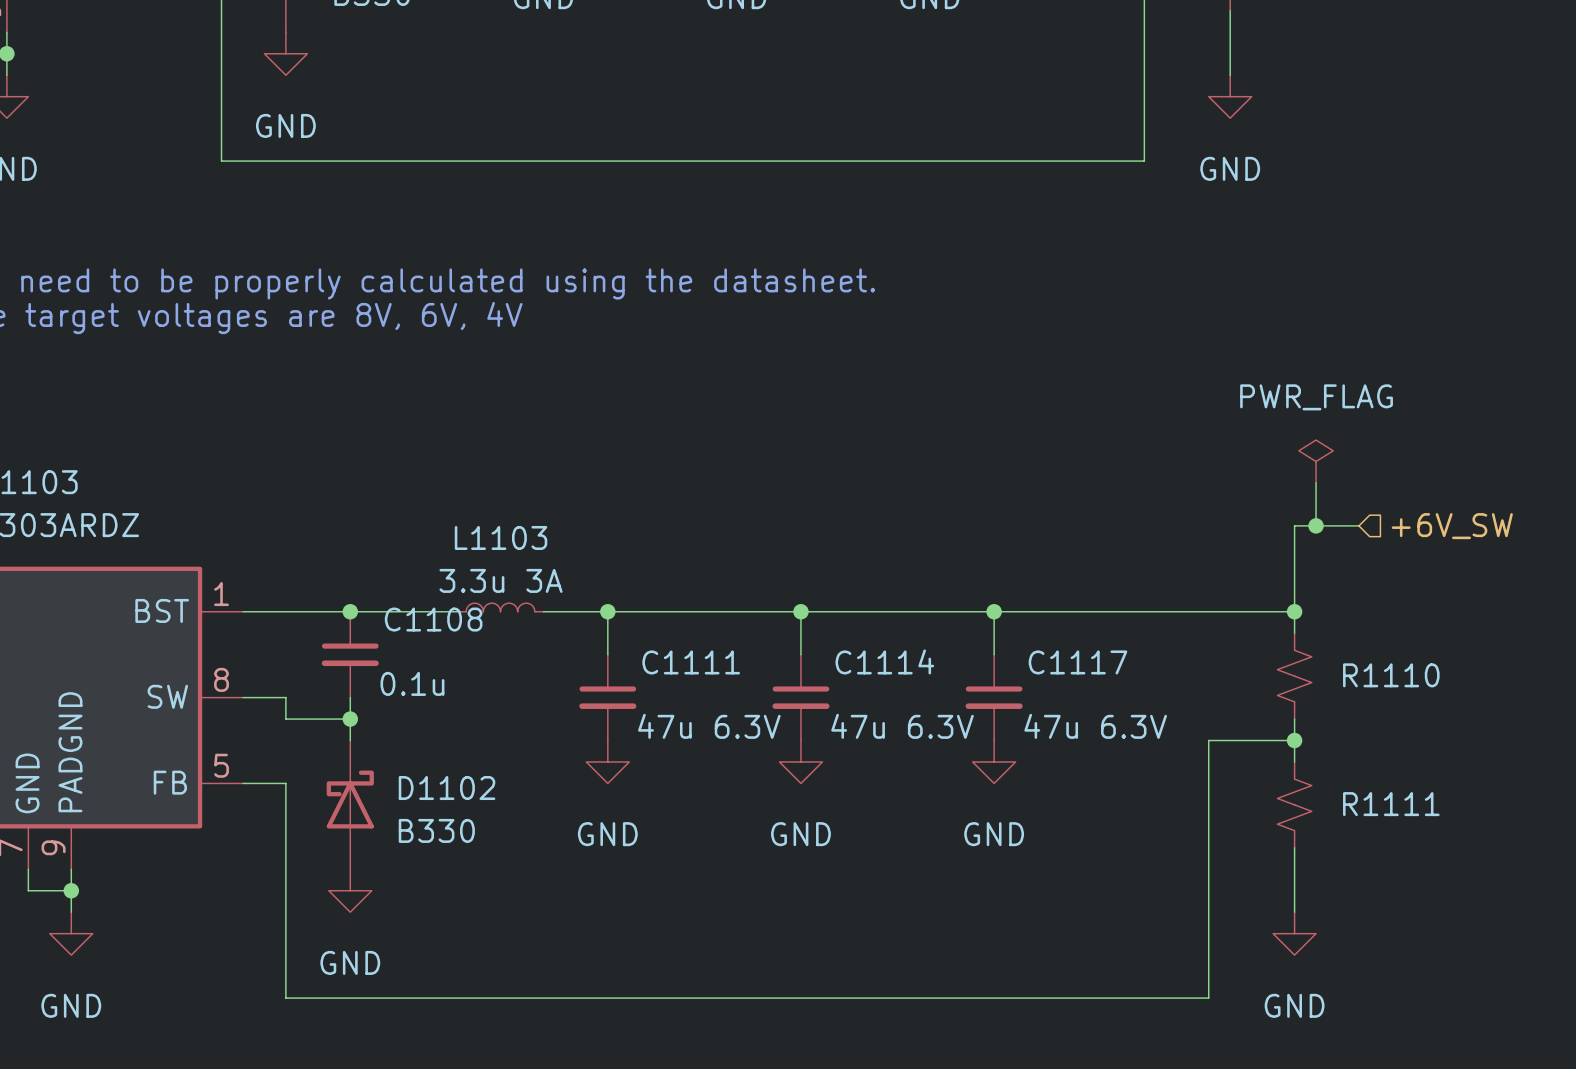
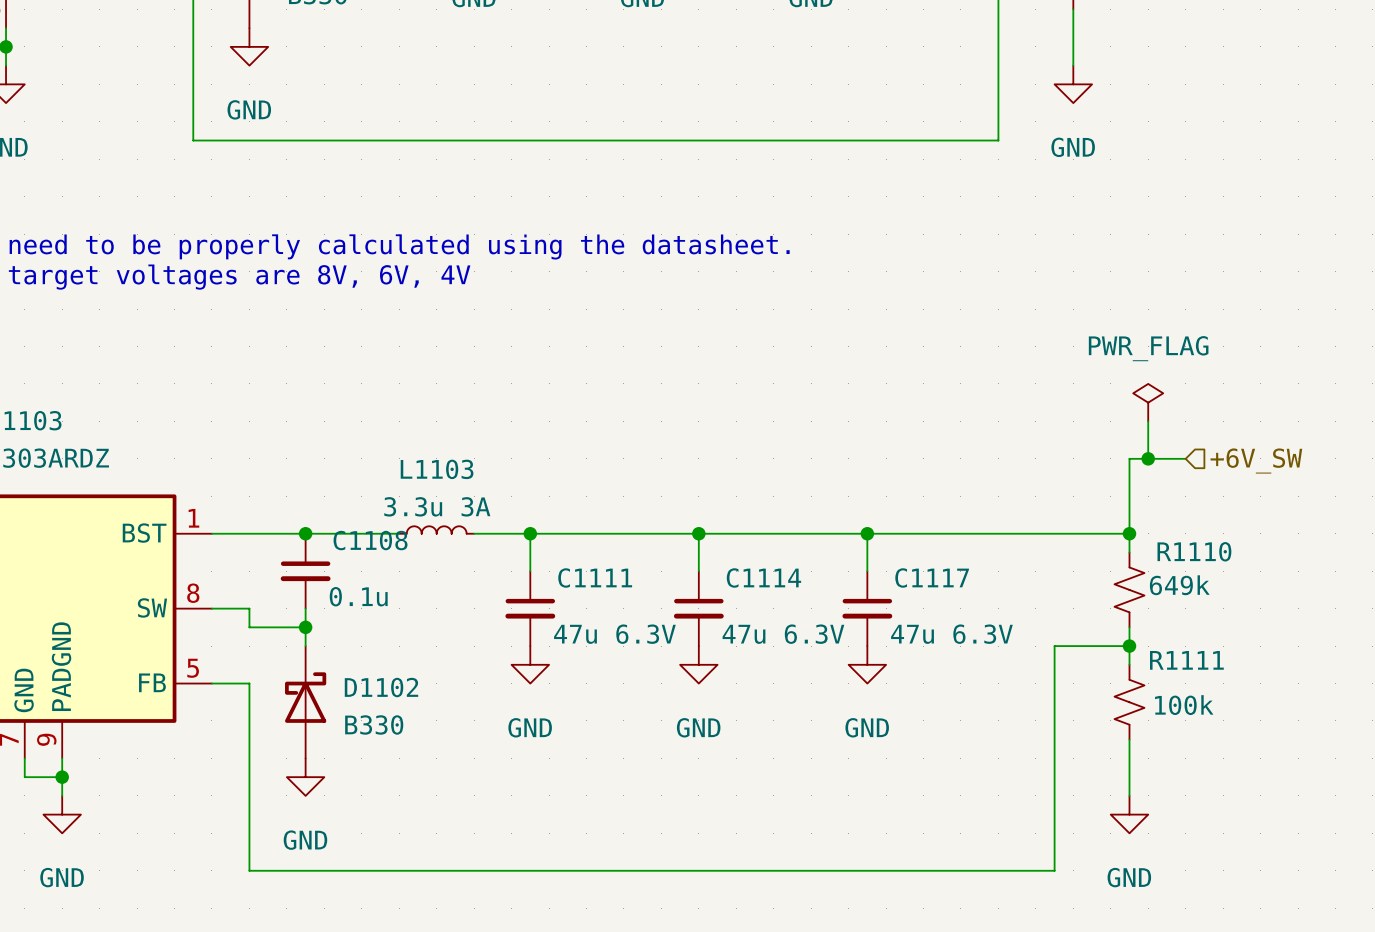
R1110 value: none -> 649k (1179, 585)
R1110 name position: R1110 (1391, 675) -> R1110 (1194, 551)
R1111 name position: R1111 (1391, 804) -> R1111 (1186, 660)
R1111 value: none -> 100k (1184, 705)

